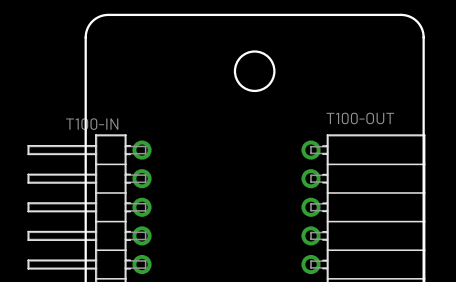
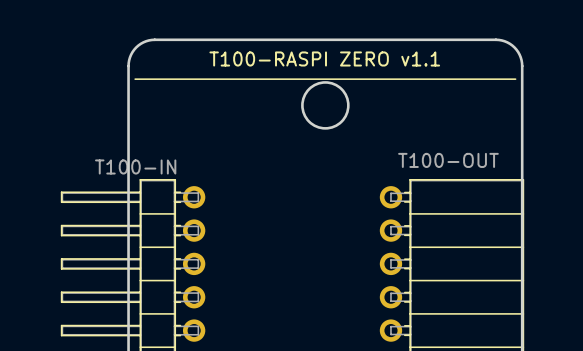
text: none -> T100-RASPI ZERO v1.1 (324, 58)
line: none -> (135, 79) (515, 79)

